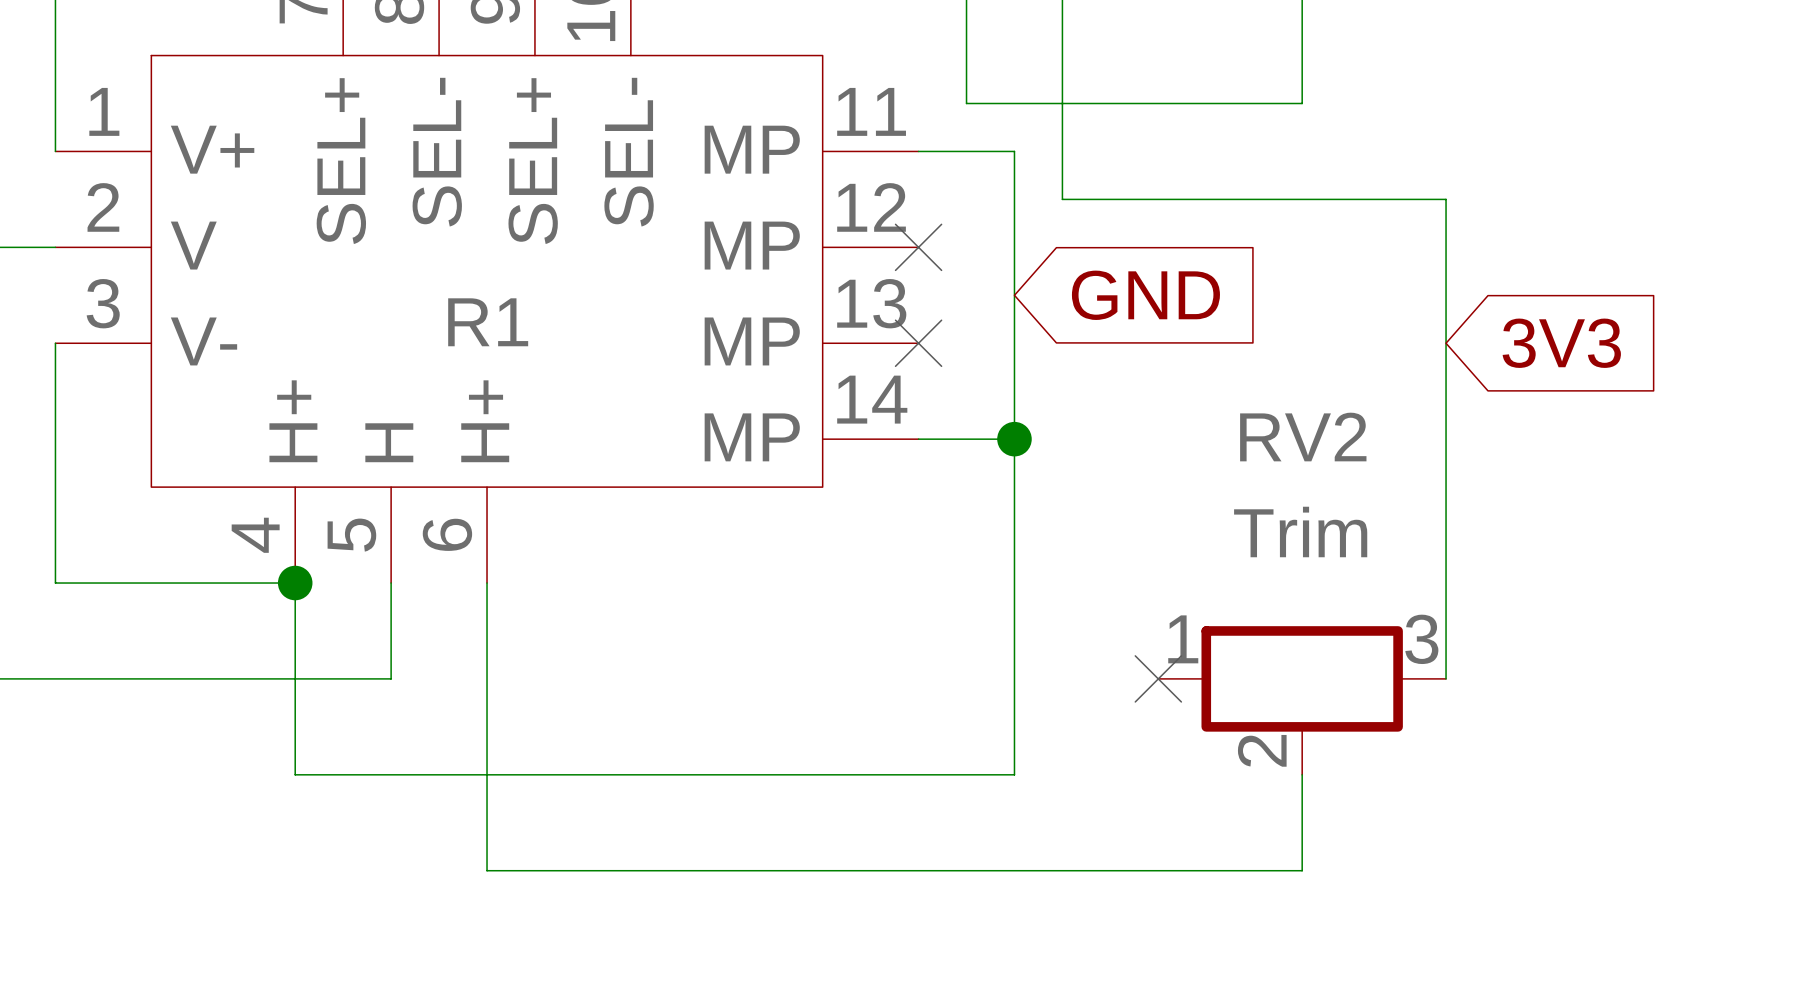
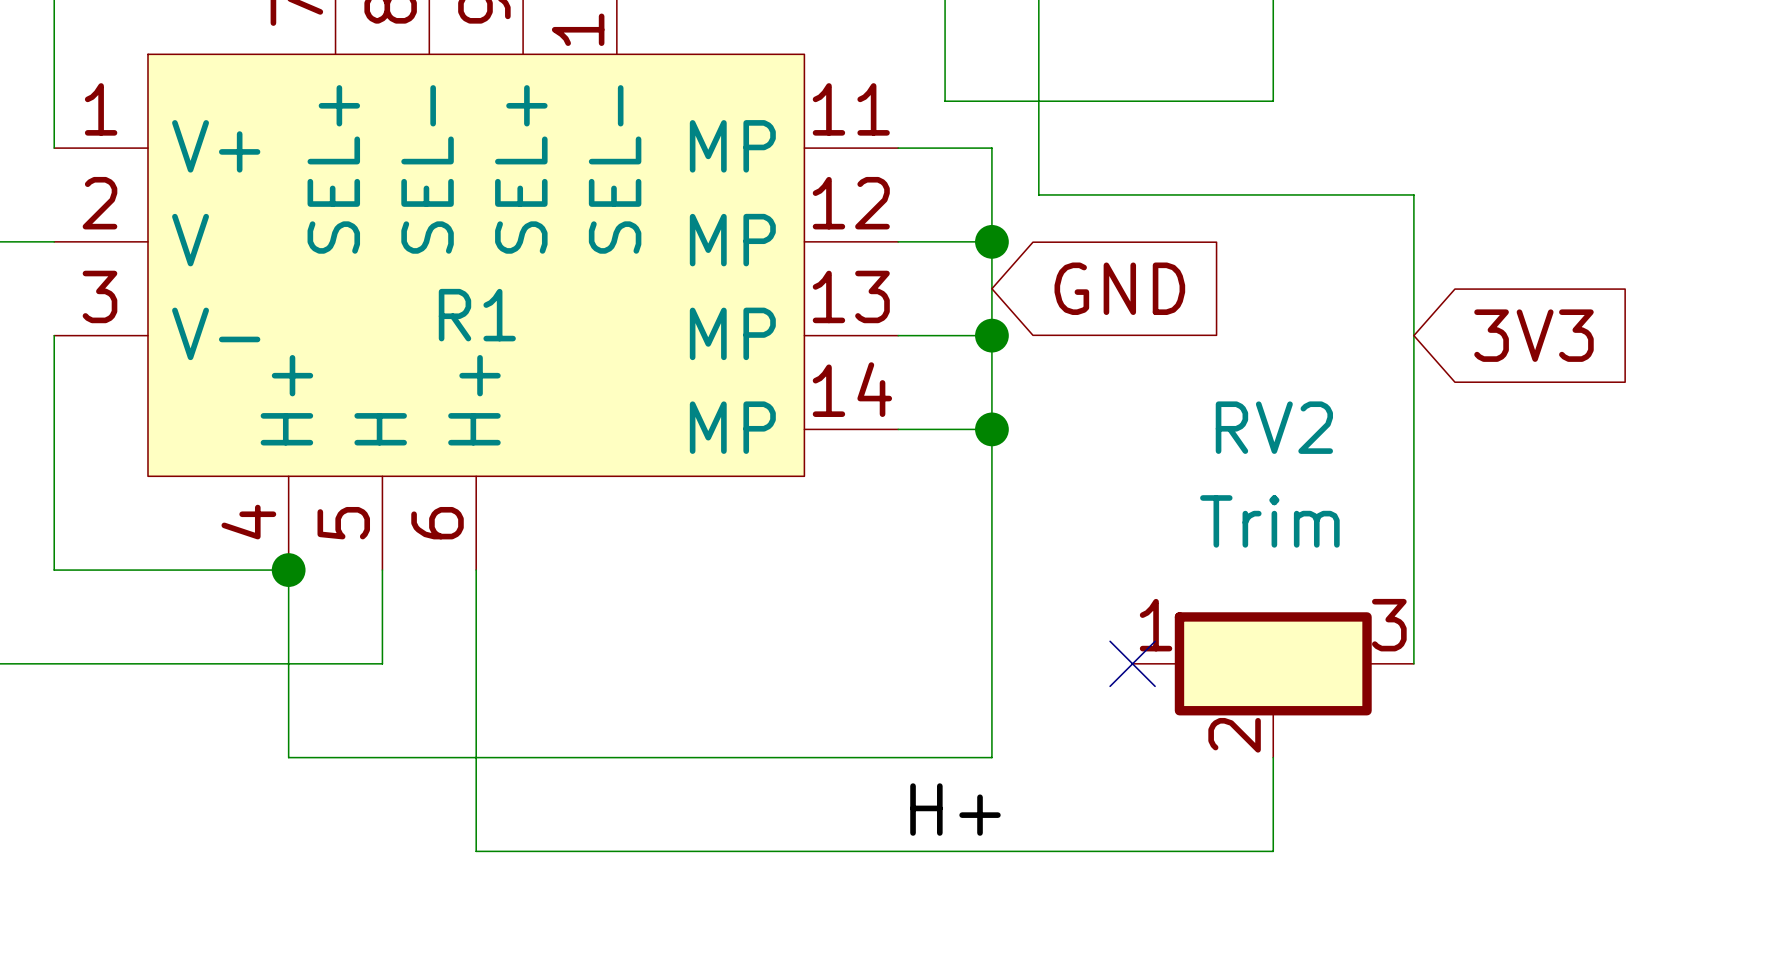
wire: none -> (898, 241) (991, 241)
no-connect mark: (918, 247) -> none
junction: none -> (991, 241)
wire: none -> (898, 335) (991, 335)
no-connect mark: (918, 343) -> none
junction: none -> (991, 335)
label: none -> H+ (955, 809)

